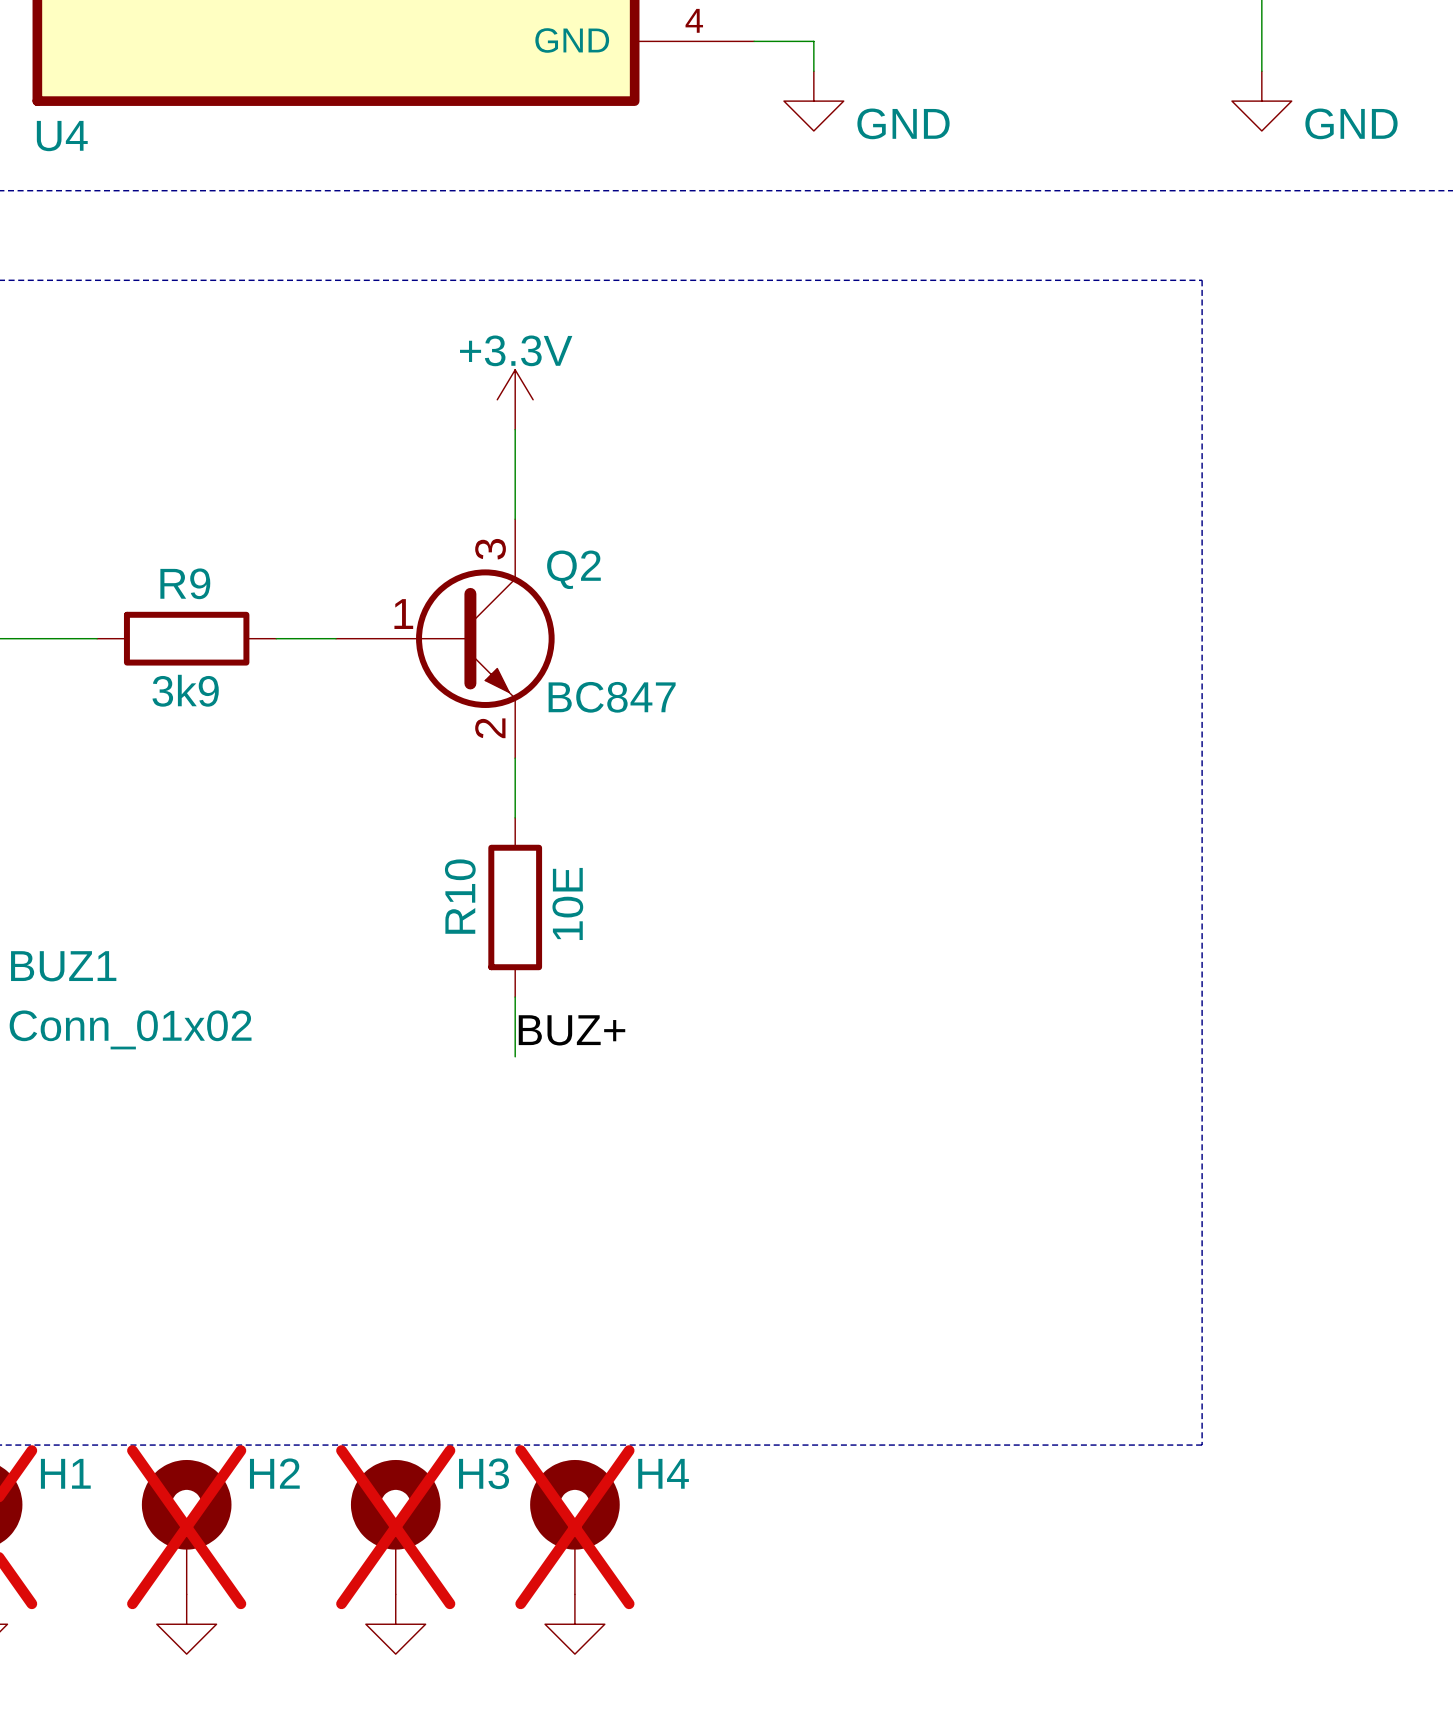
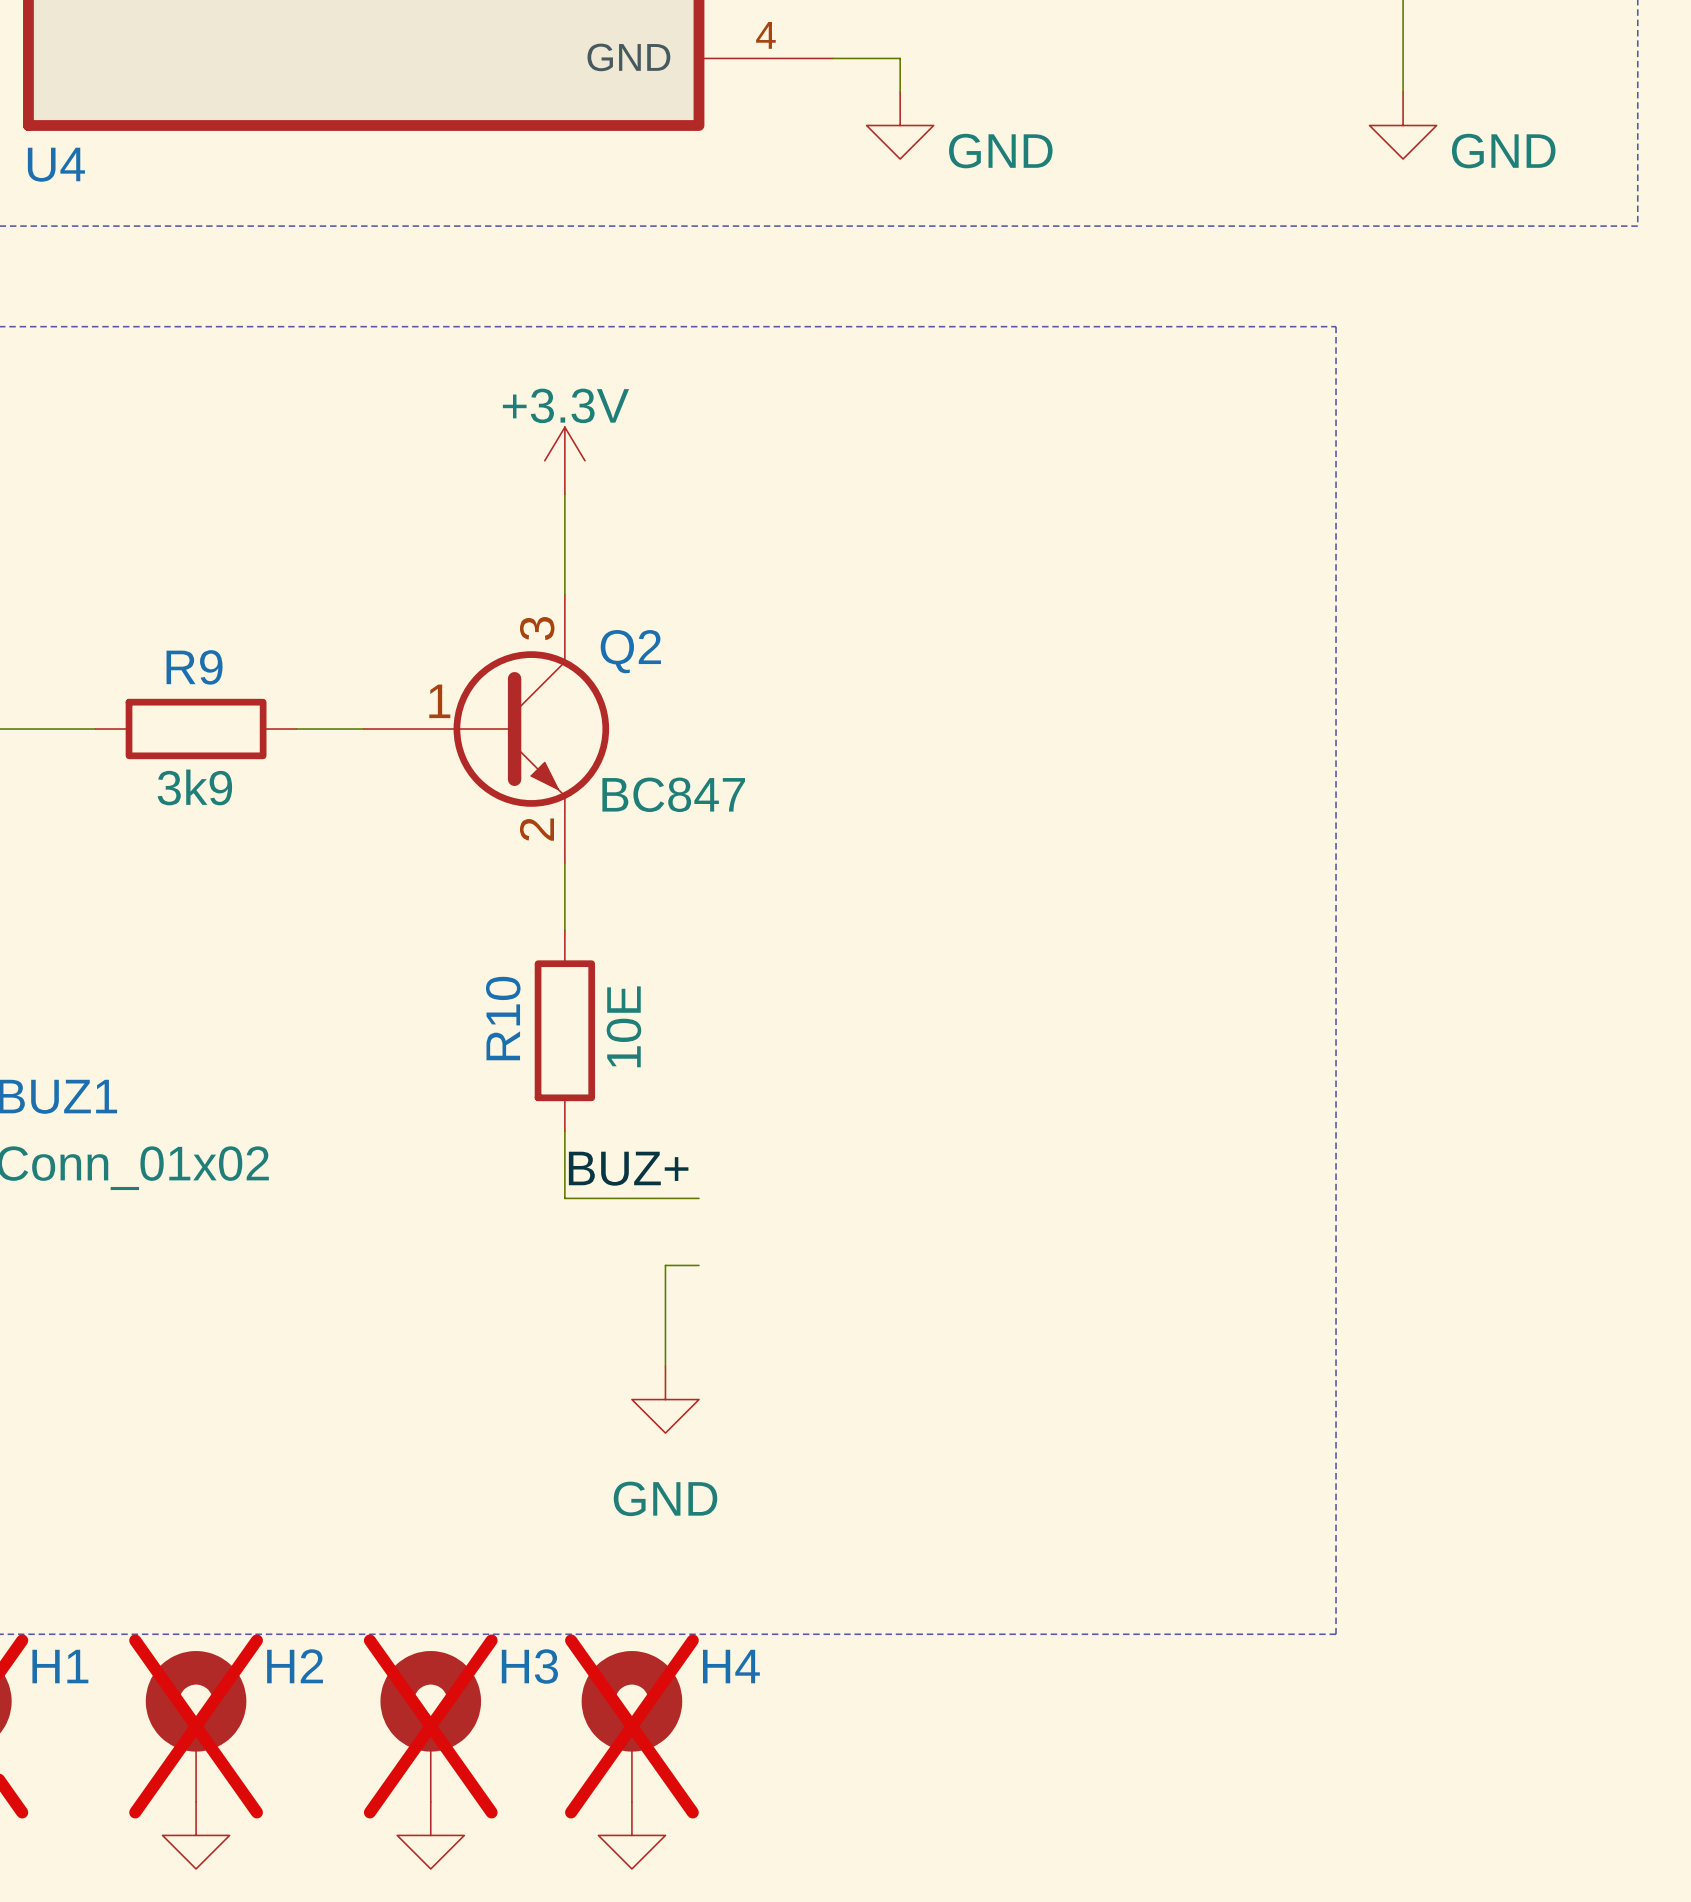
wire: none -> (564, 1198) (698, 1198)
wire: none -> (698, 1265) (665, 1265) (665, 1366)
power symbol: none -> GND (665, 1399)

